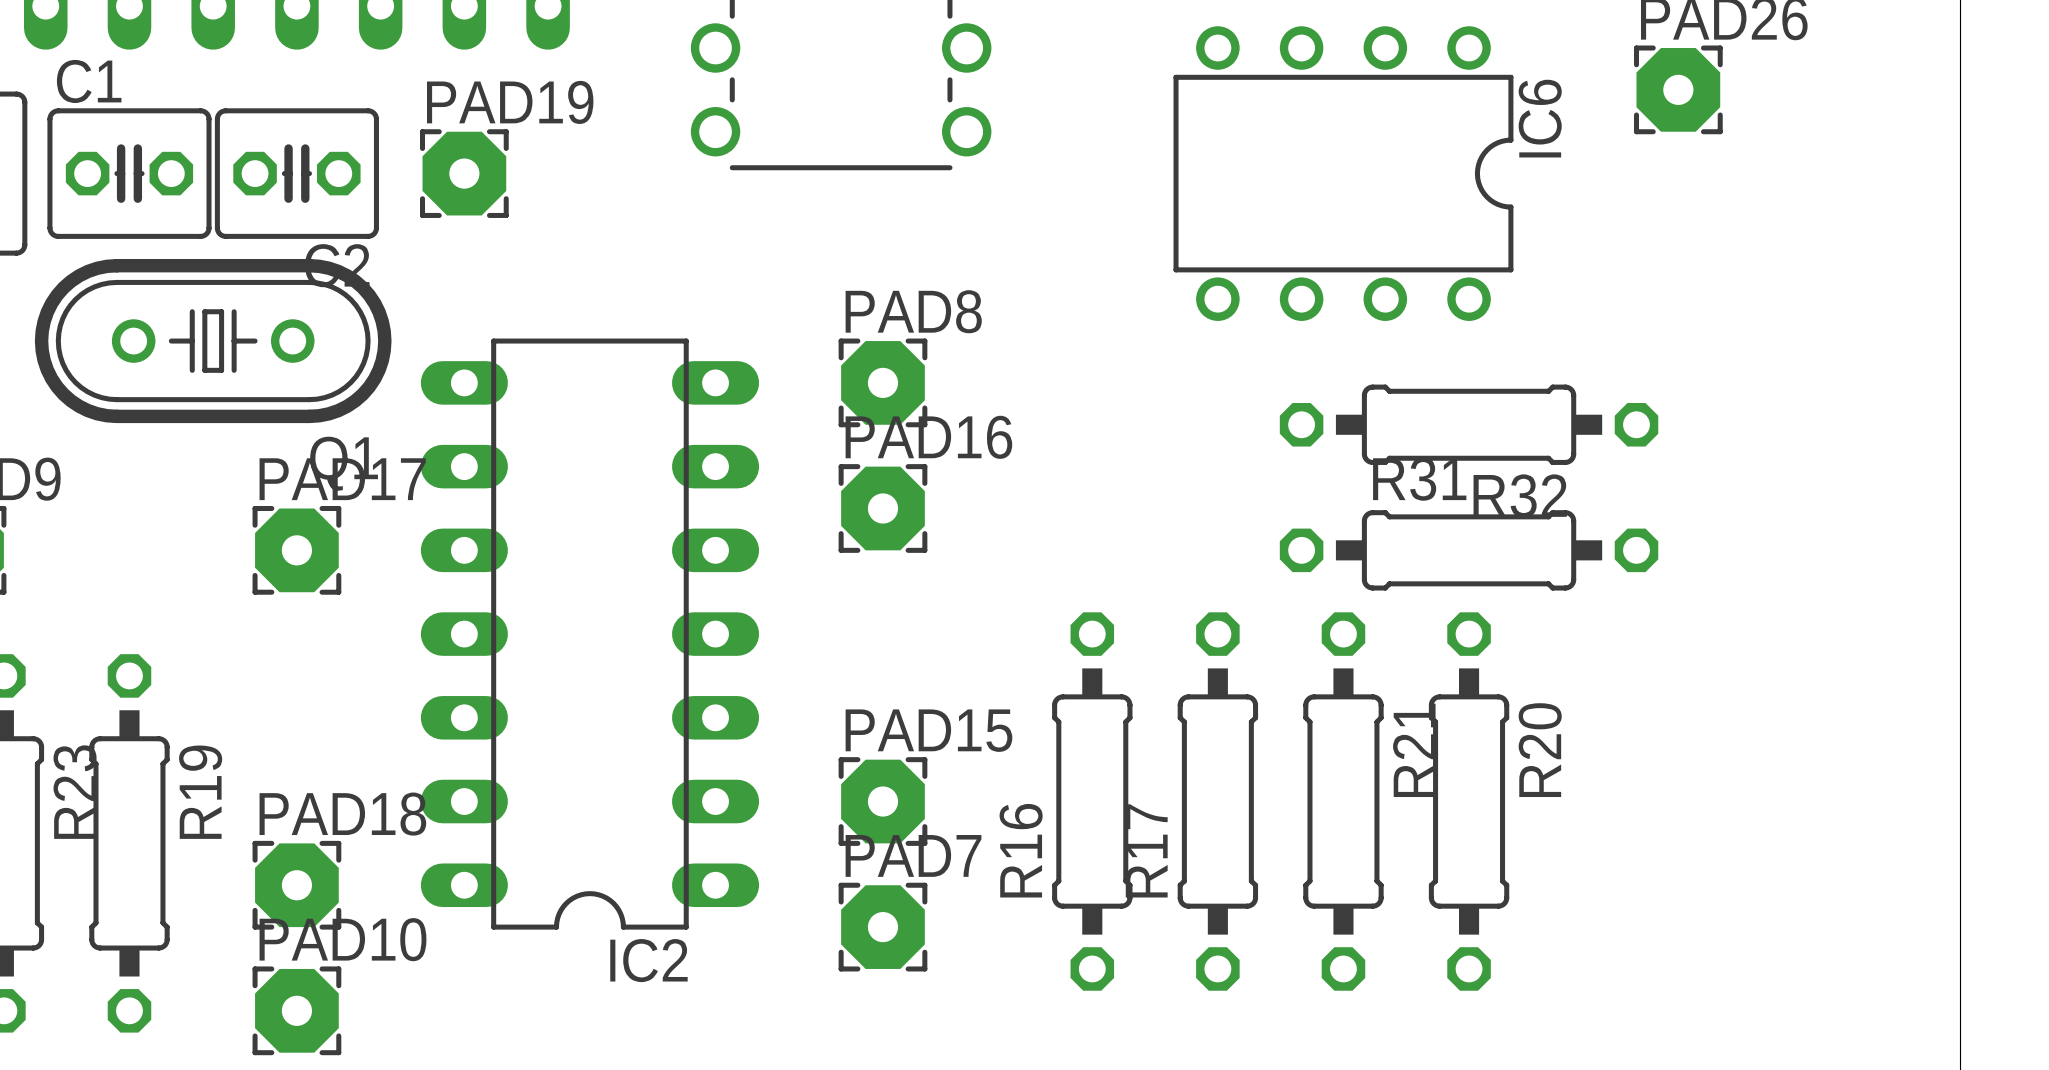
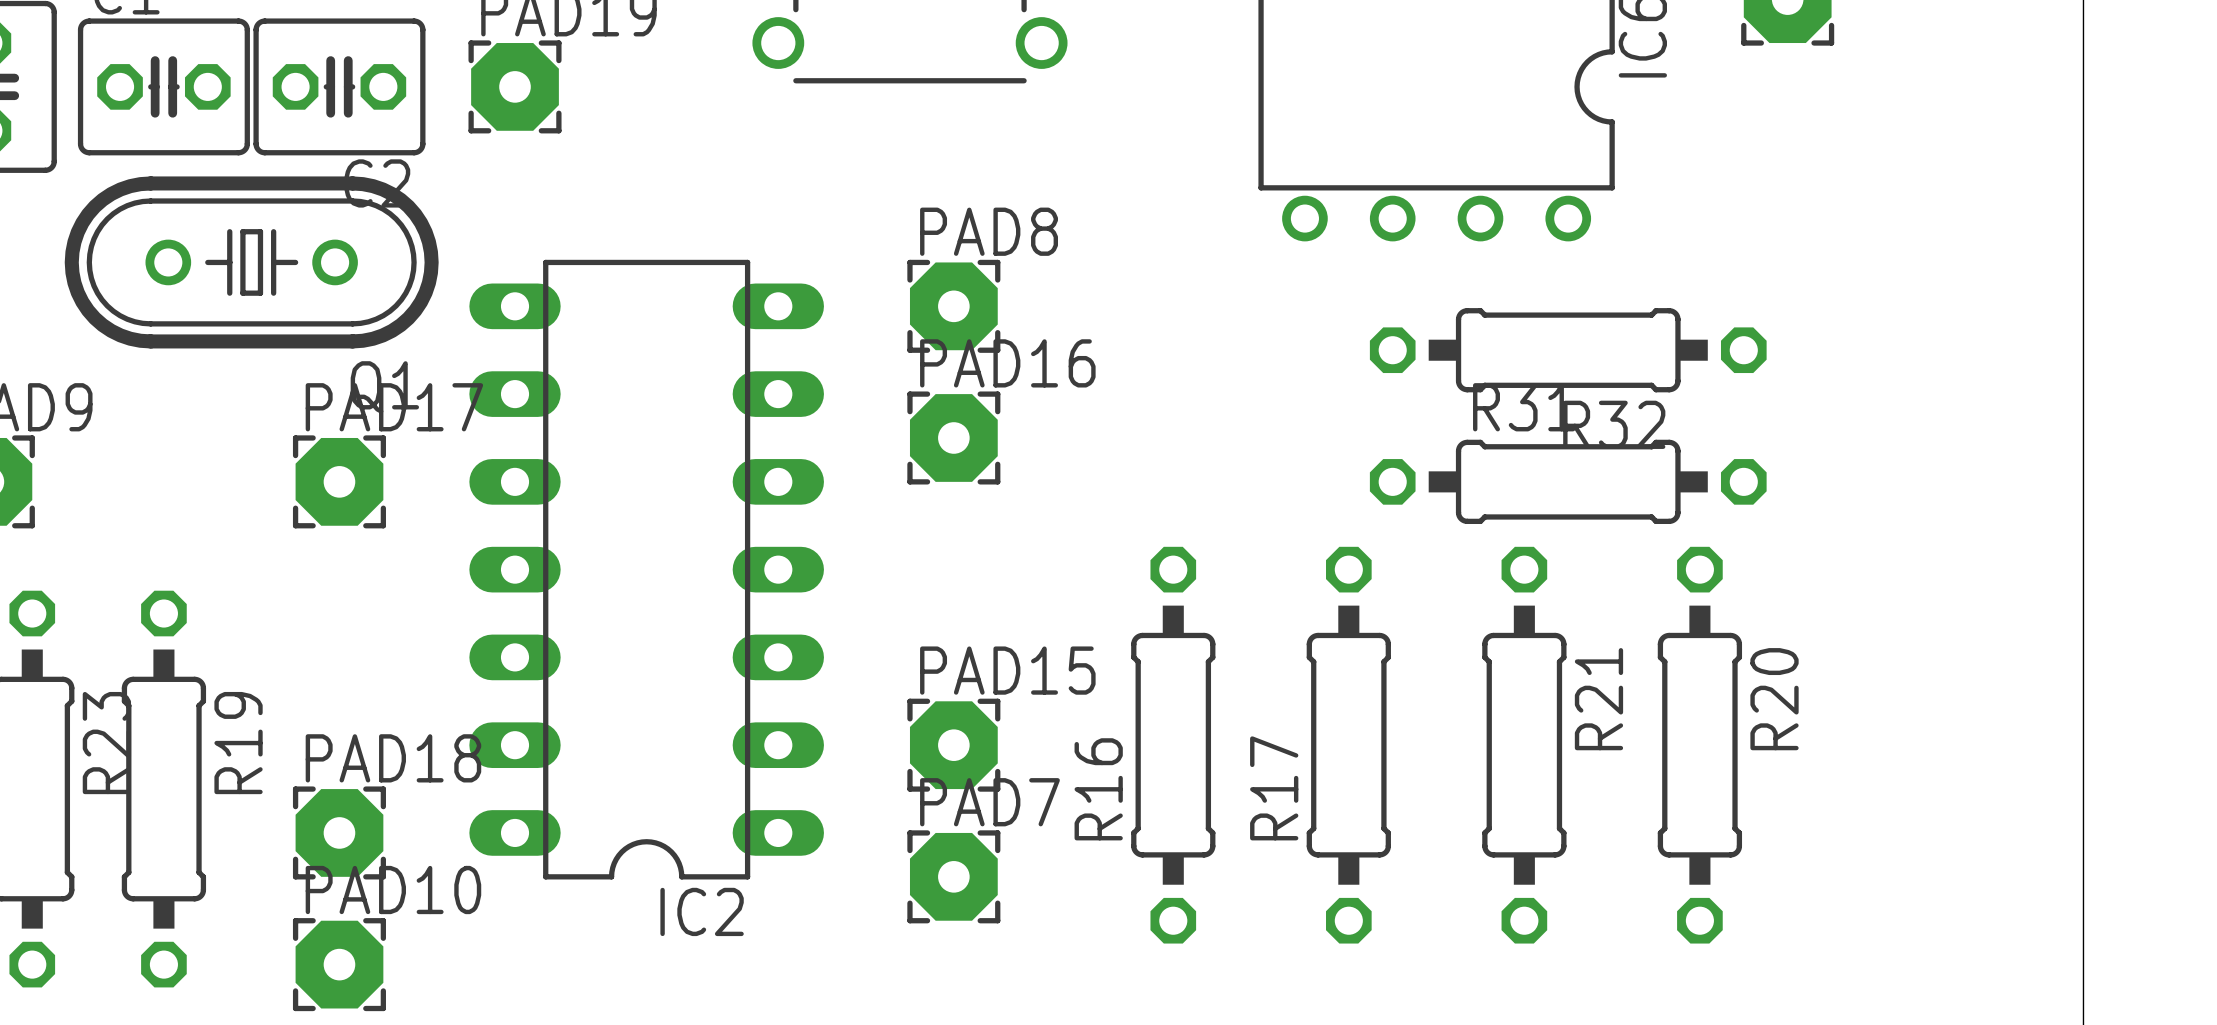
R17 position: (1217, 801) -> (1348, 745)
R21 position: (1343, 801) -> (1524, 745)
R20 position: (1469, 801) -> (1699, 745)

